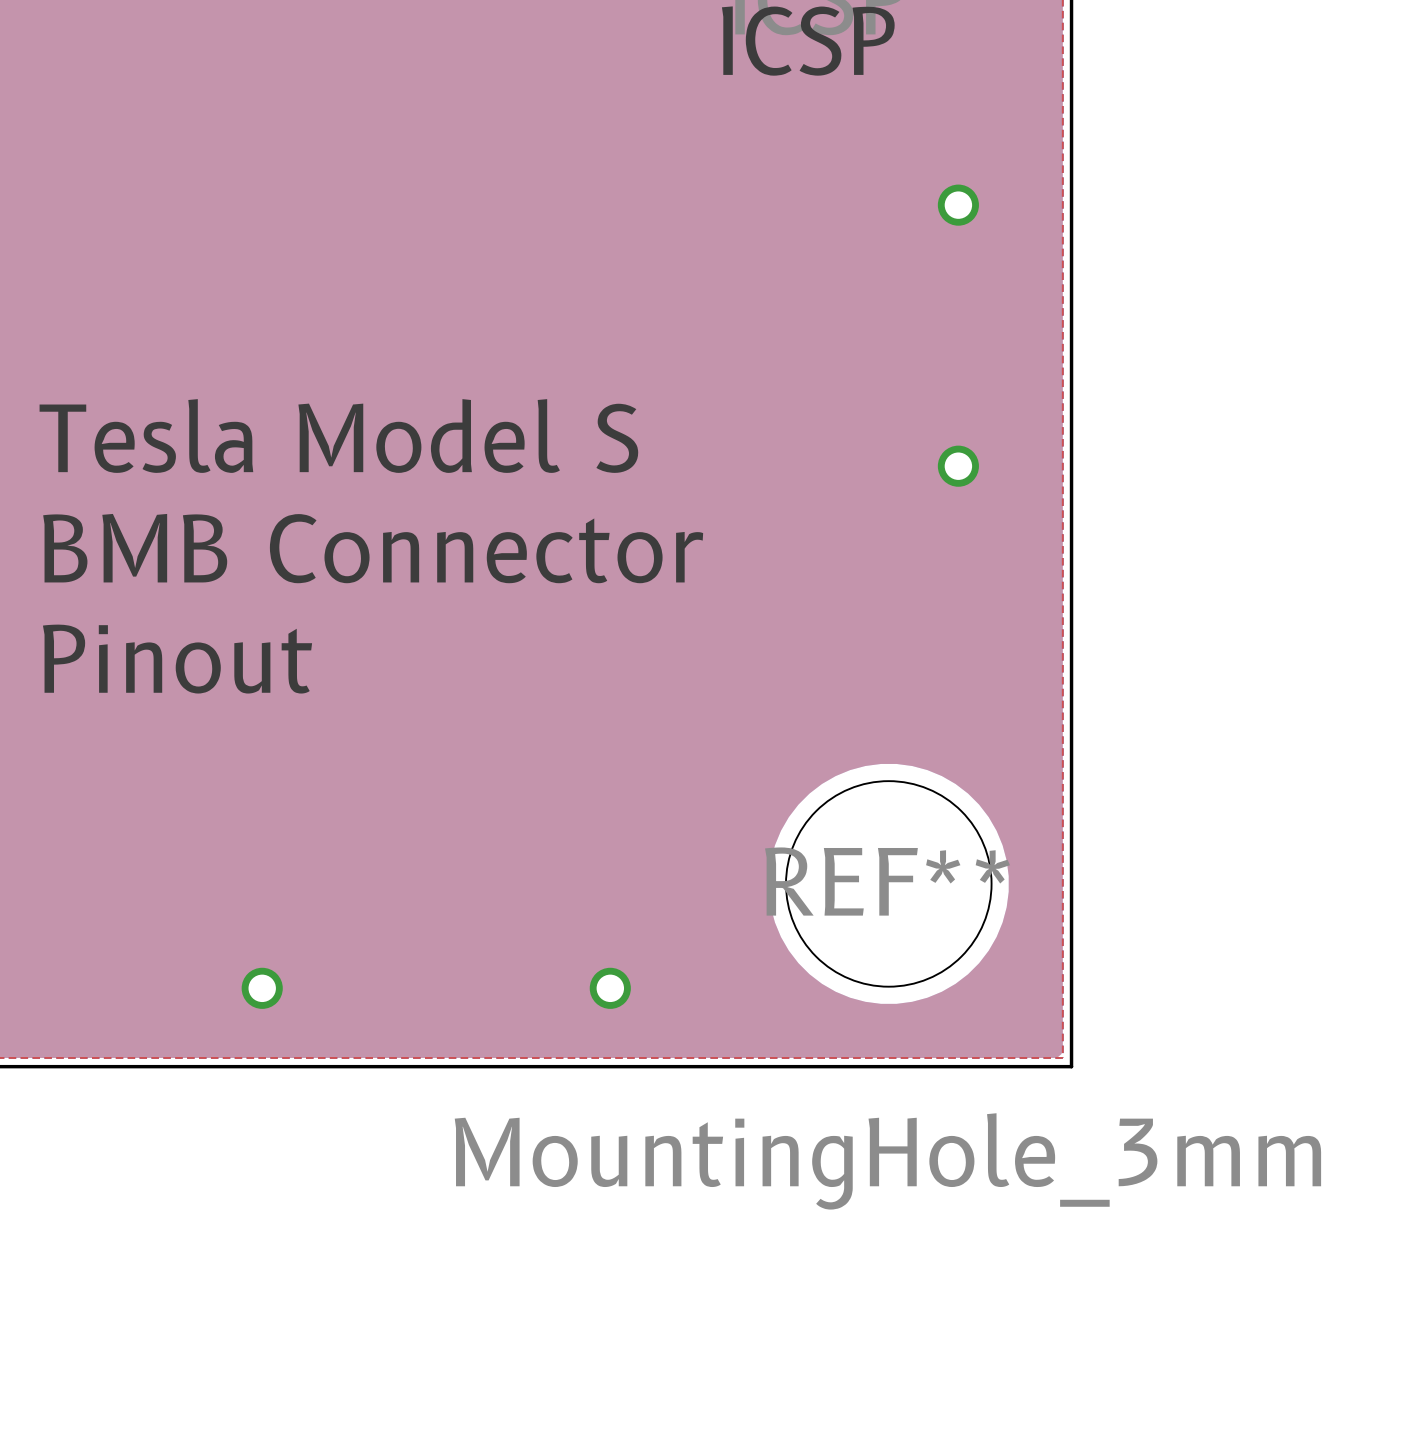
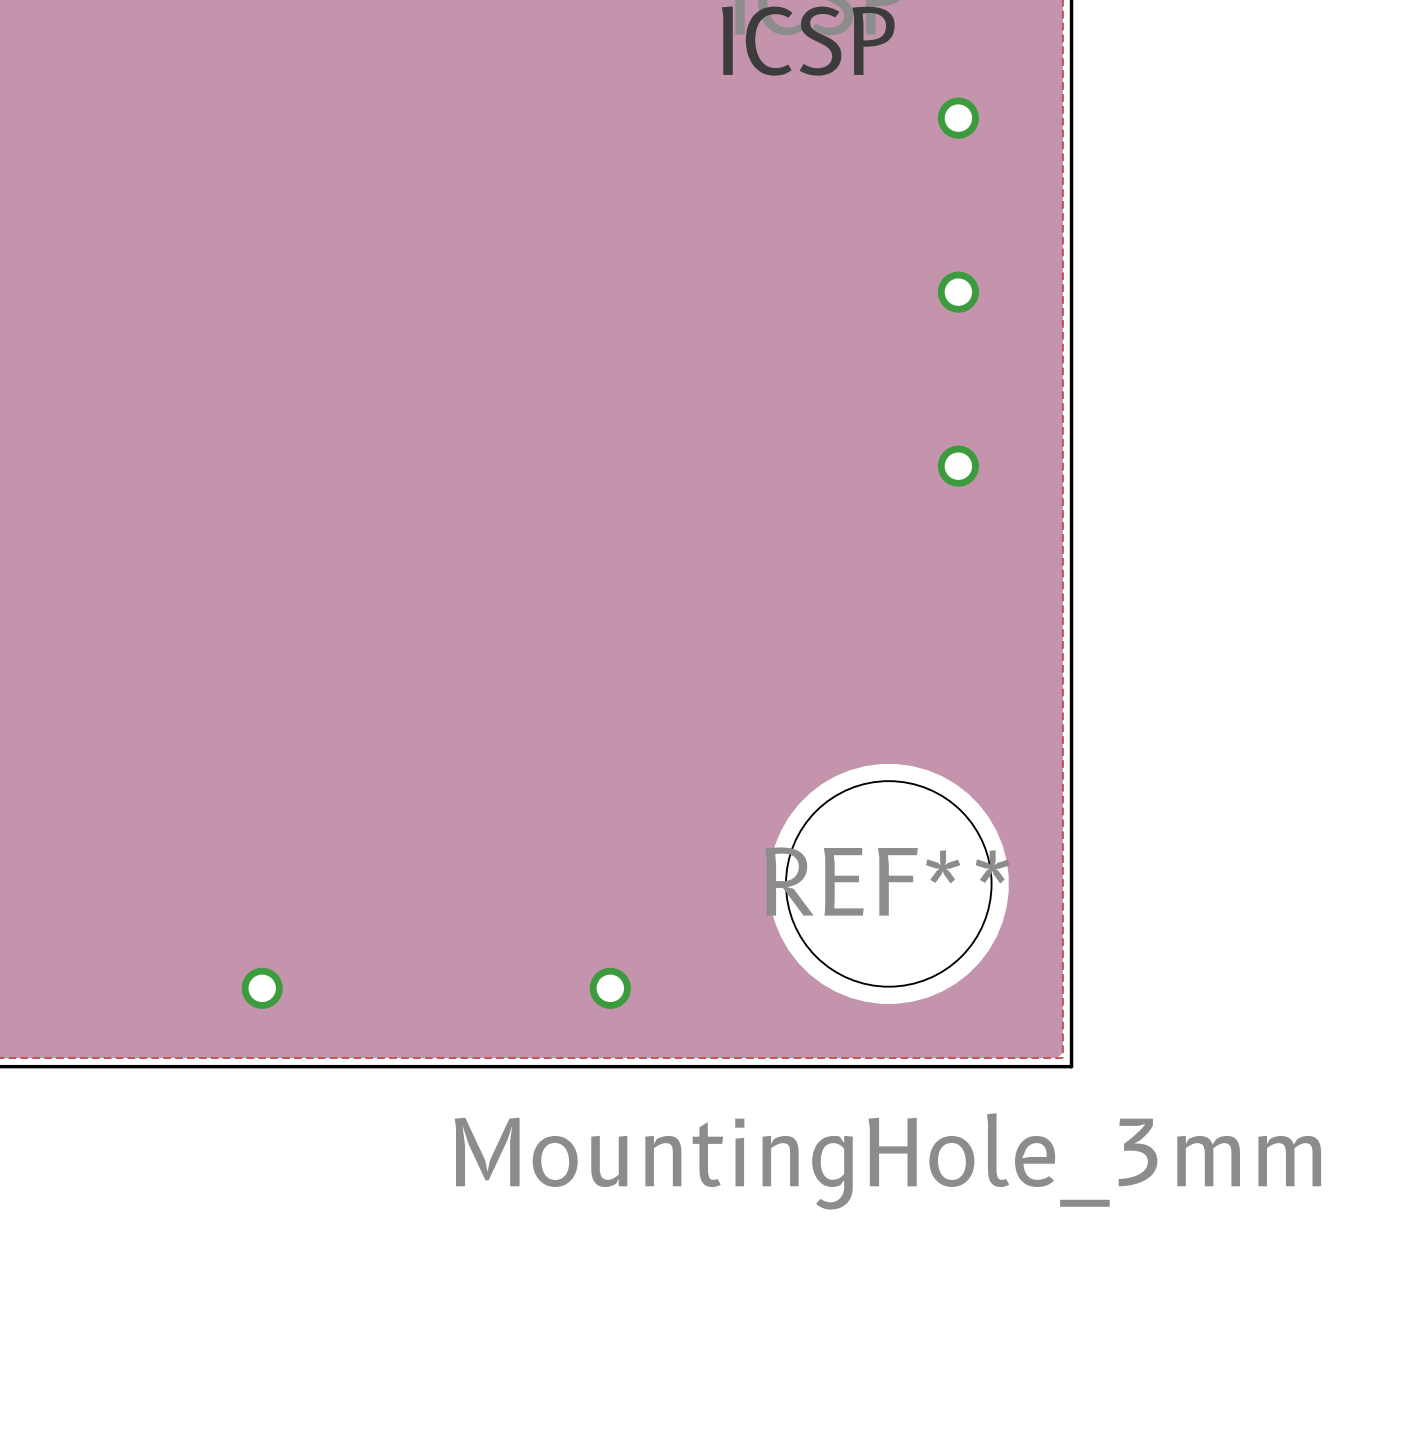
via: none -> (958, 118)
via: (958, 205) -> none
via: none -> (958, 292)
text: Tesla Model S (338, 436) -> none
text: BMB Connector (373, 548) -> none
text: Pinout (177, 659) -> none

